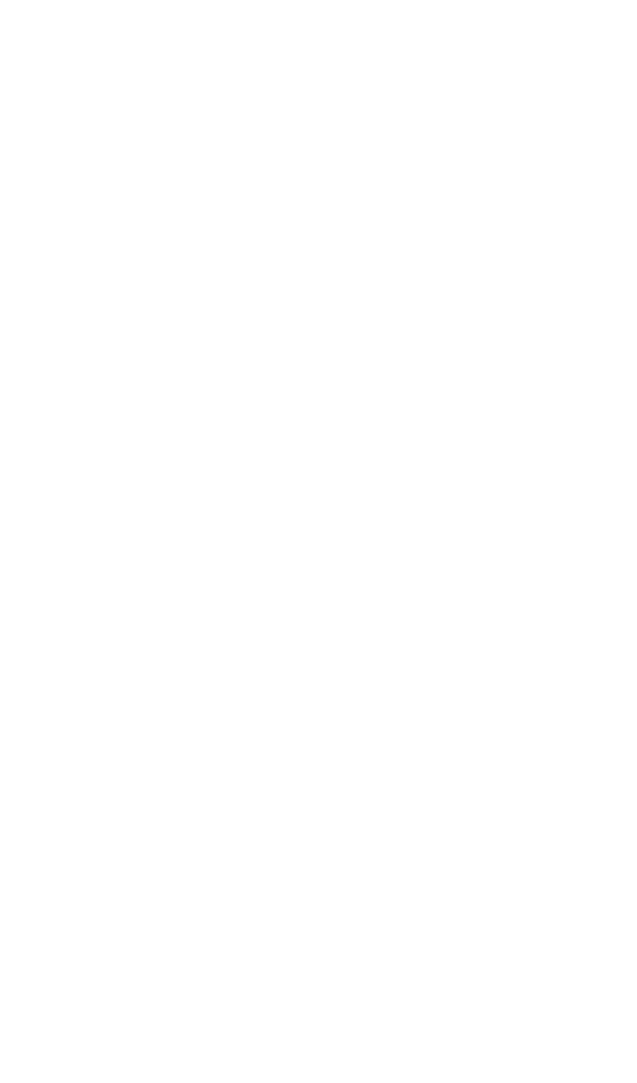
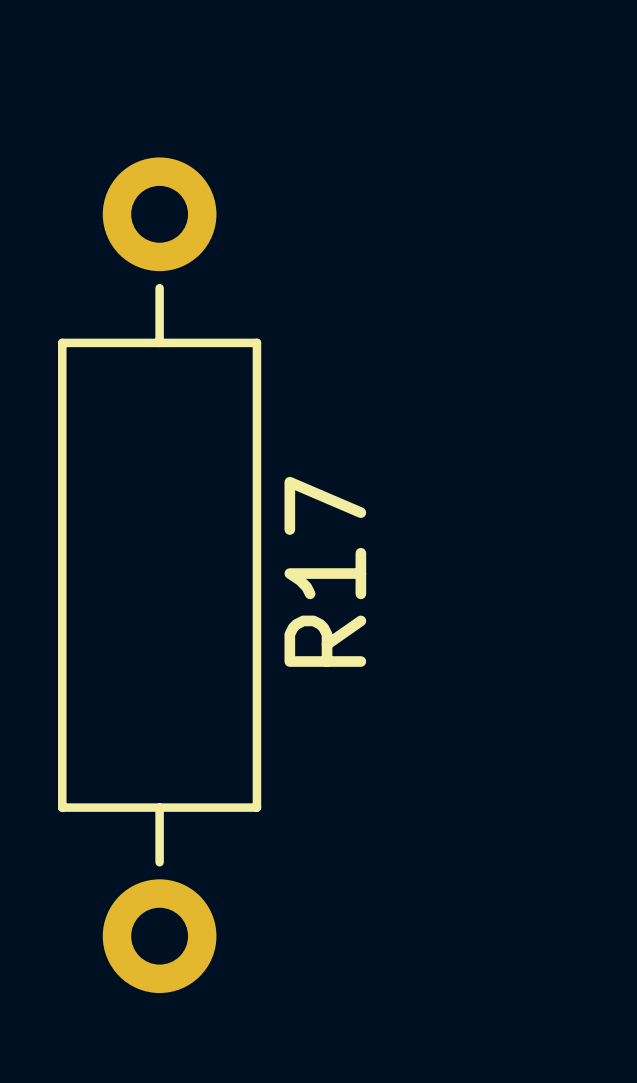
R17: none -> (159, 575)

